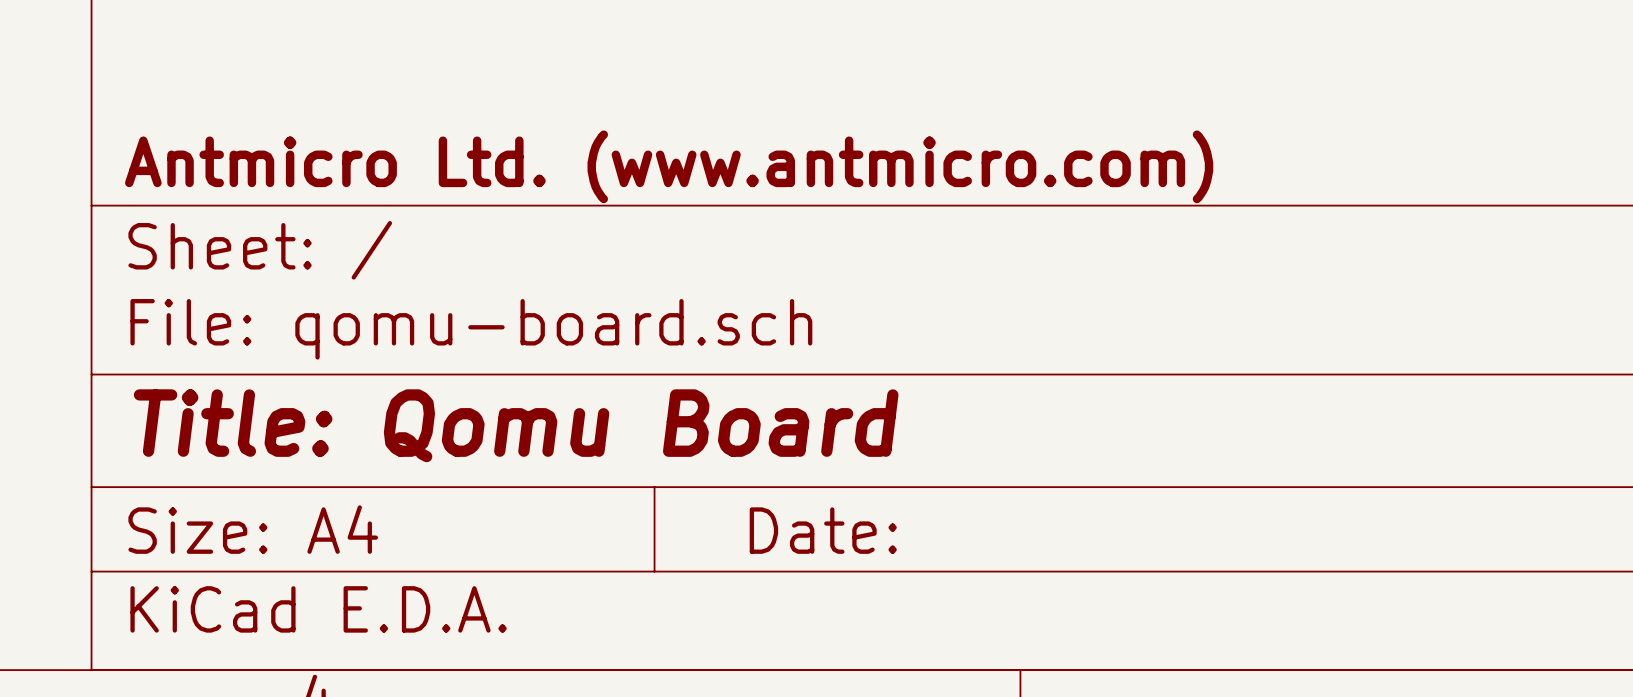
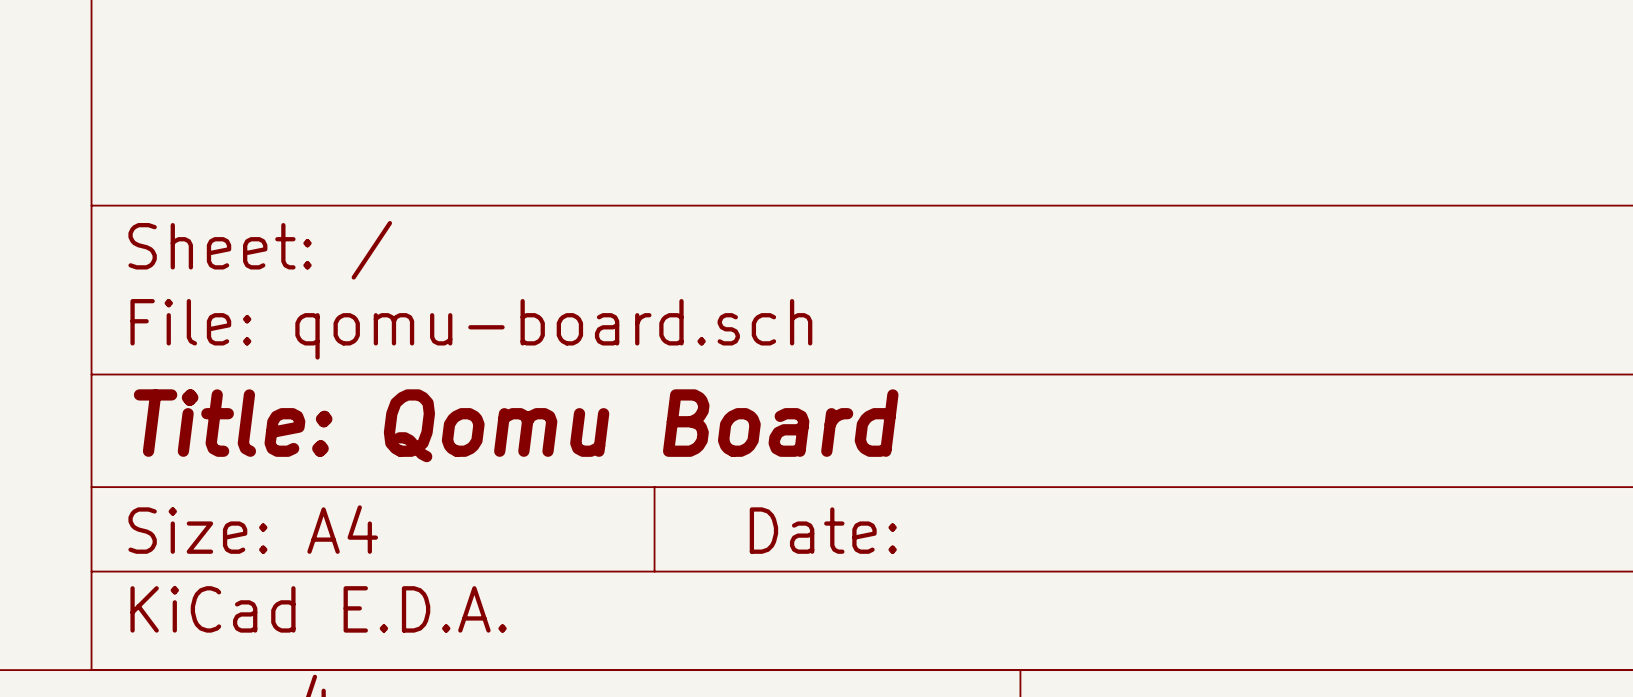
title block: Antmicro Ltd. (www.antmicro.com) (669, 166) -> none

